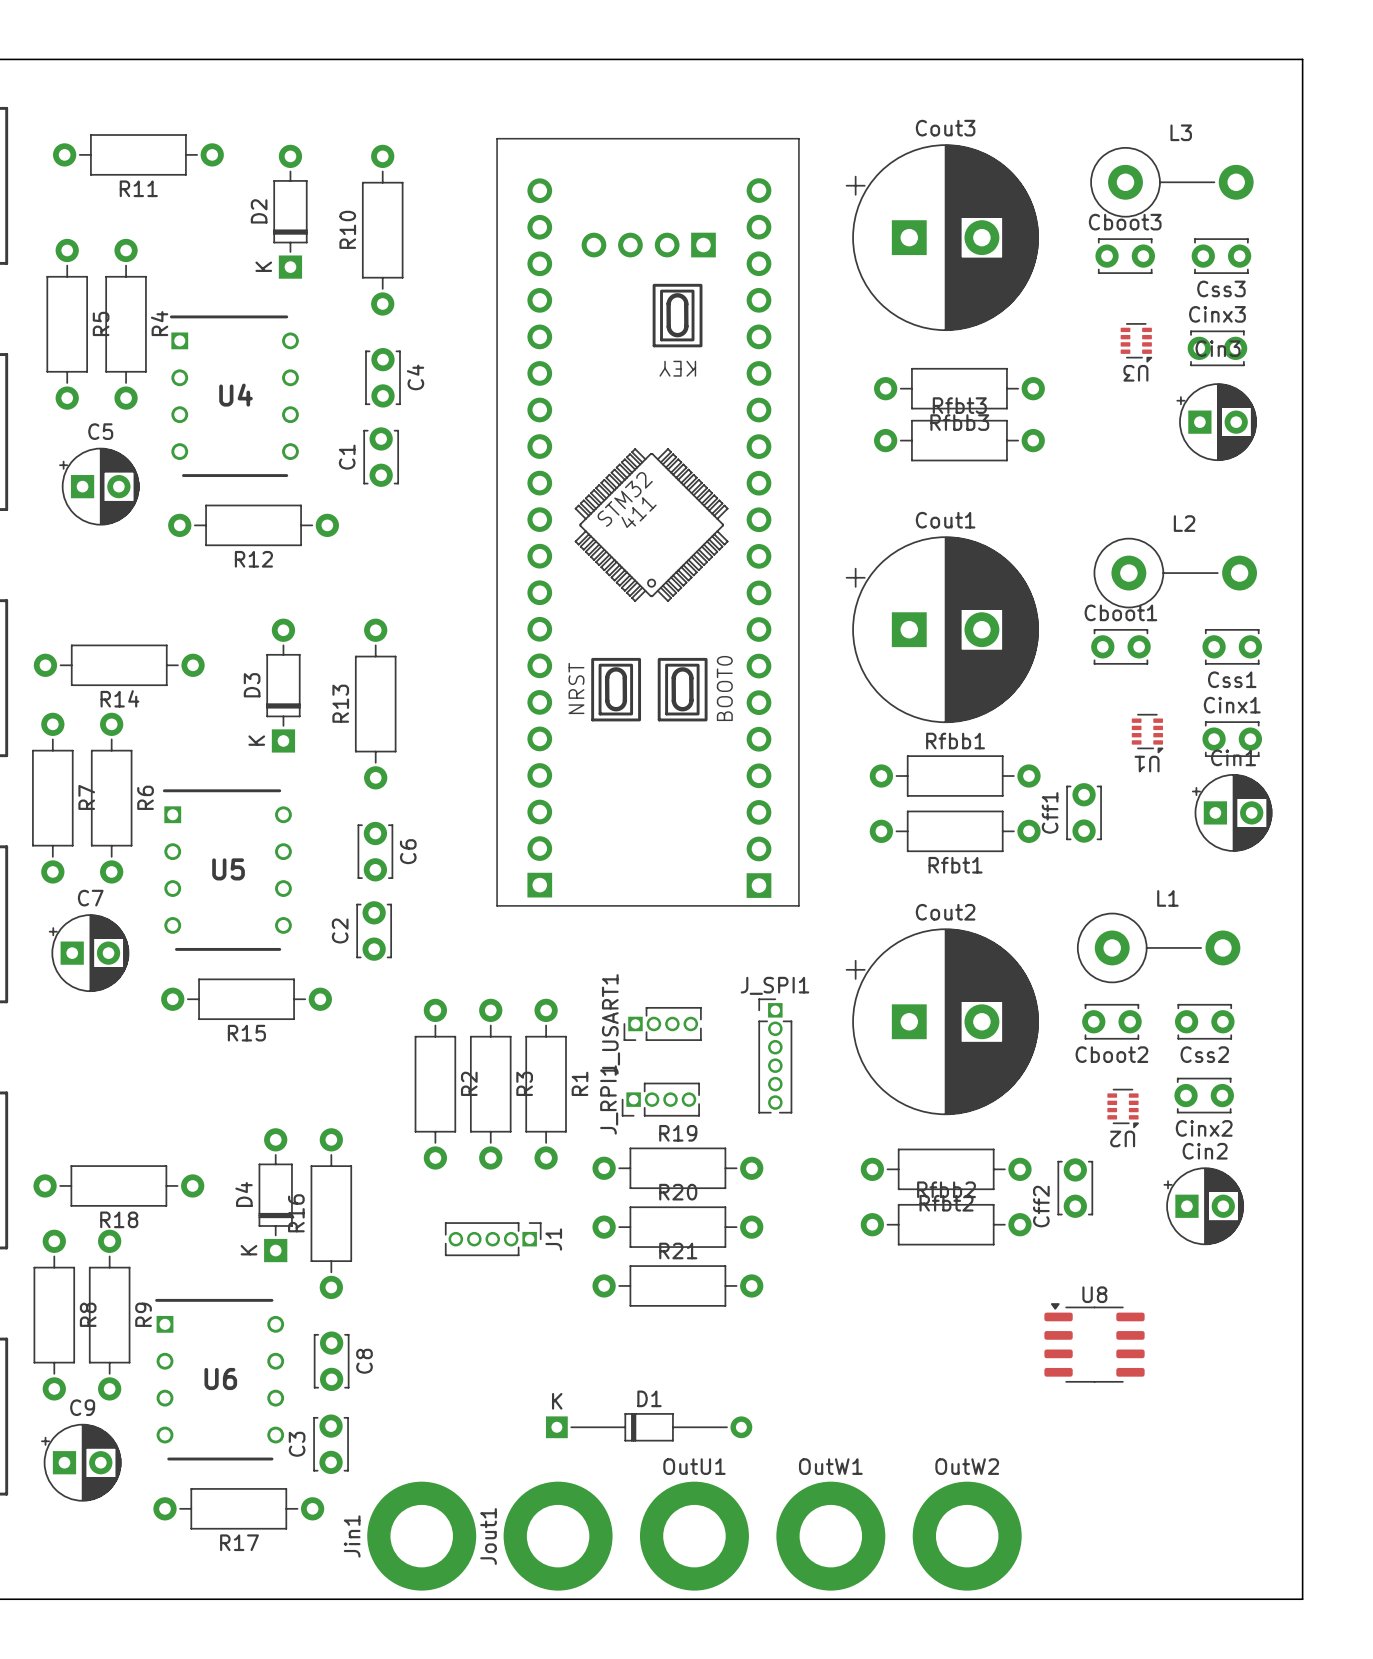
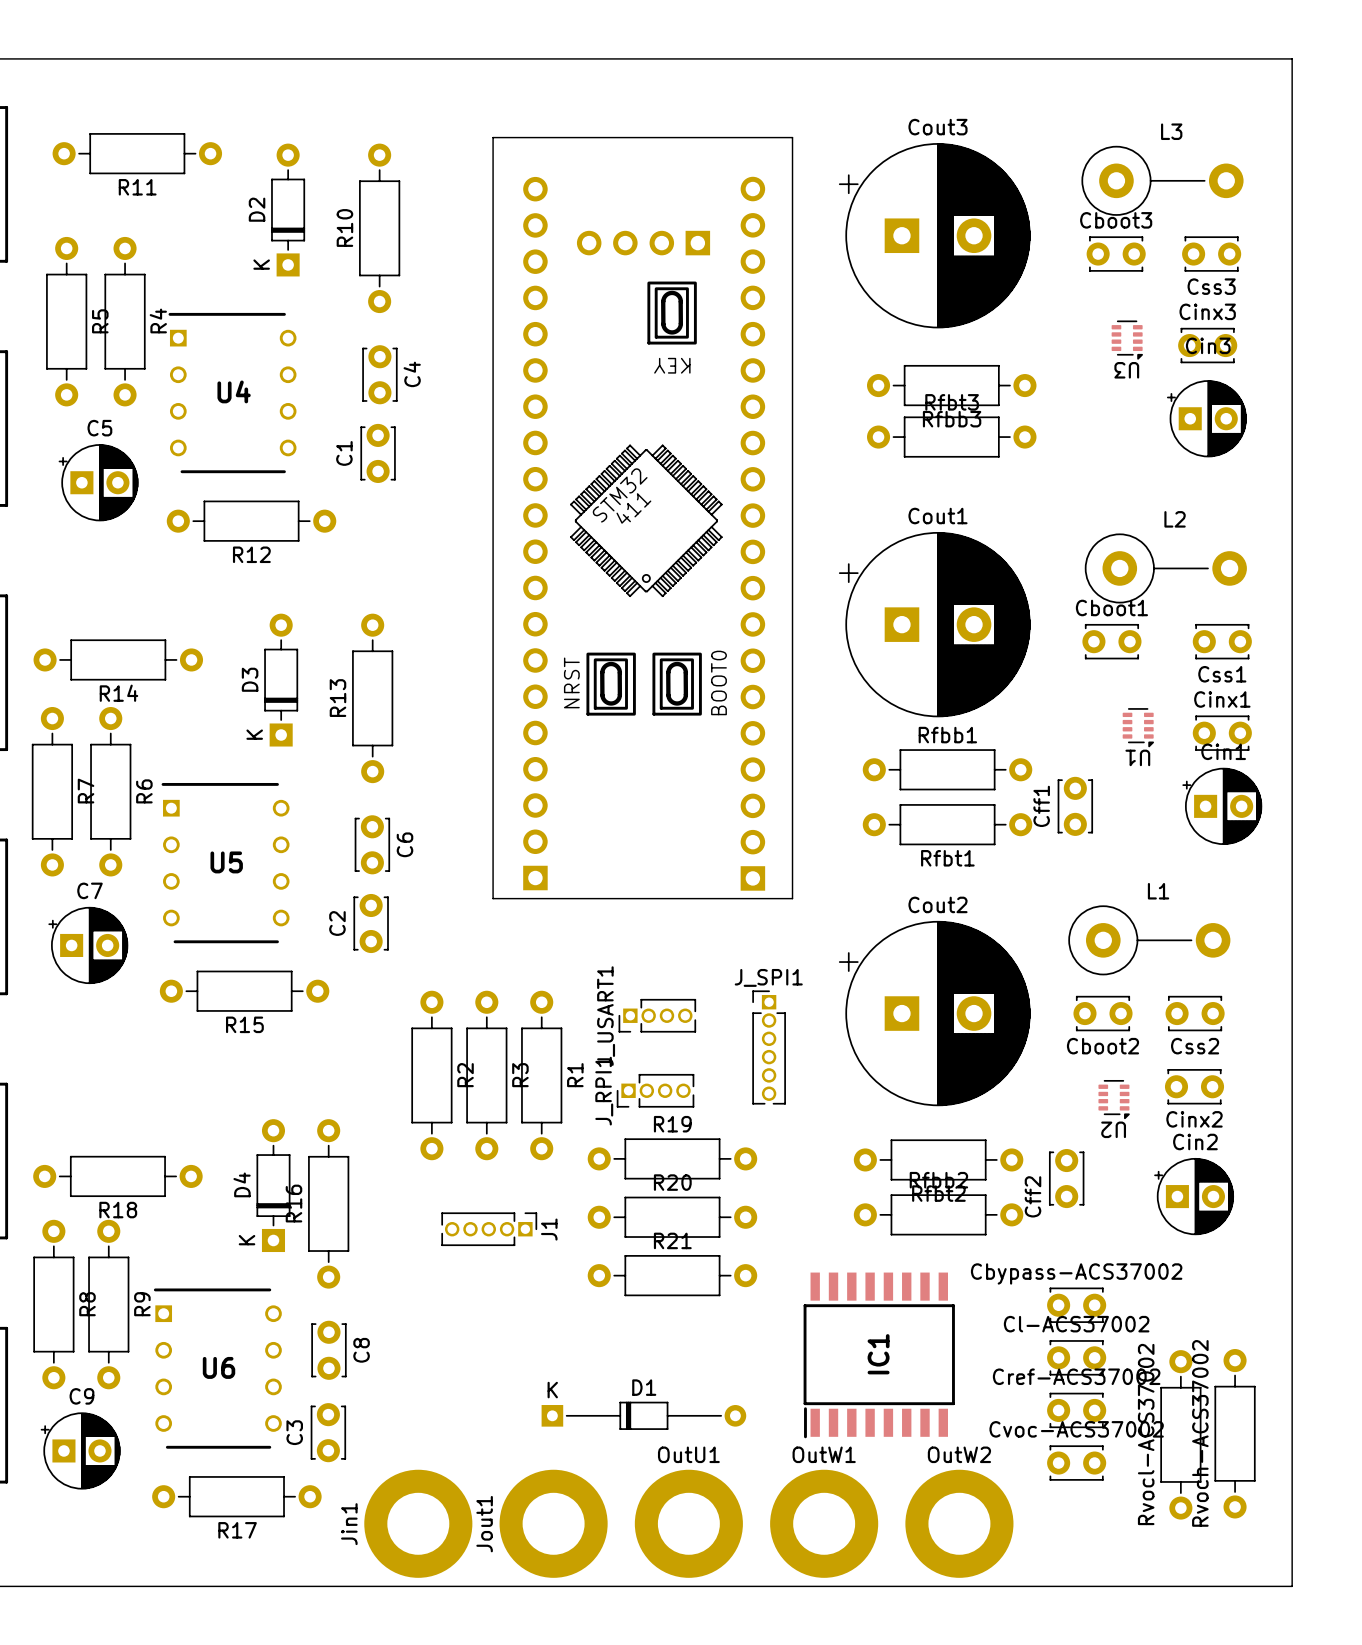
Cbypass-ACS37002: none -> (1076, 1305)
U8: (1094, 1342) -> none
IC1: none -> (879, 1355)
Cl-ACS37002: none -> (1076, 1357)
Cref-ACS37002: none -> (1076, 1410)
Rvoch-ACS37002: none -> (1235, 1433)
Rvocl-ACS37002: none -> (1180, 1434)
Cvoc-ACS37002: none -> (1076, 1463)

